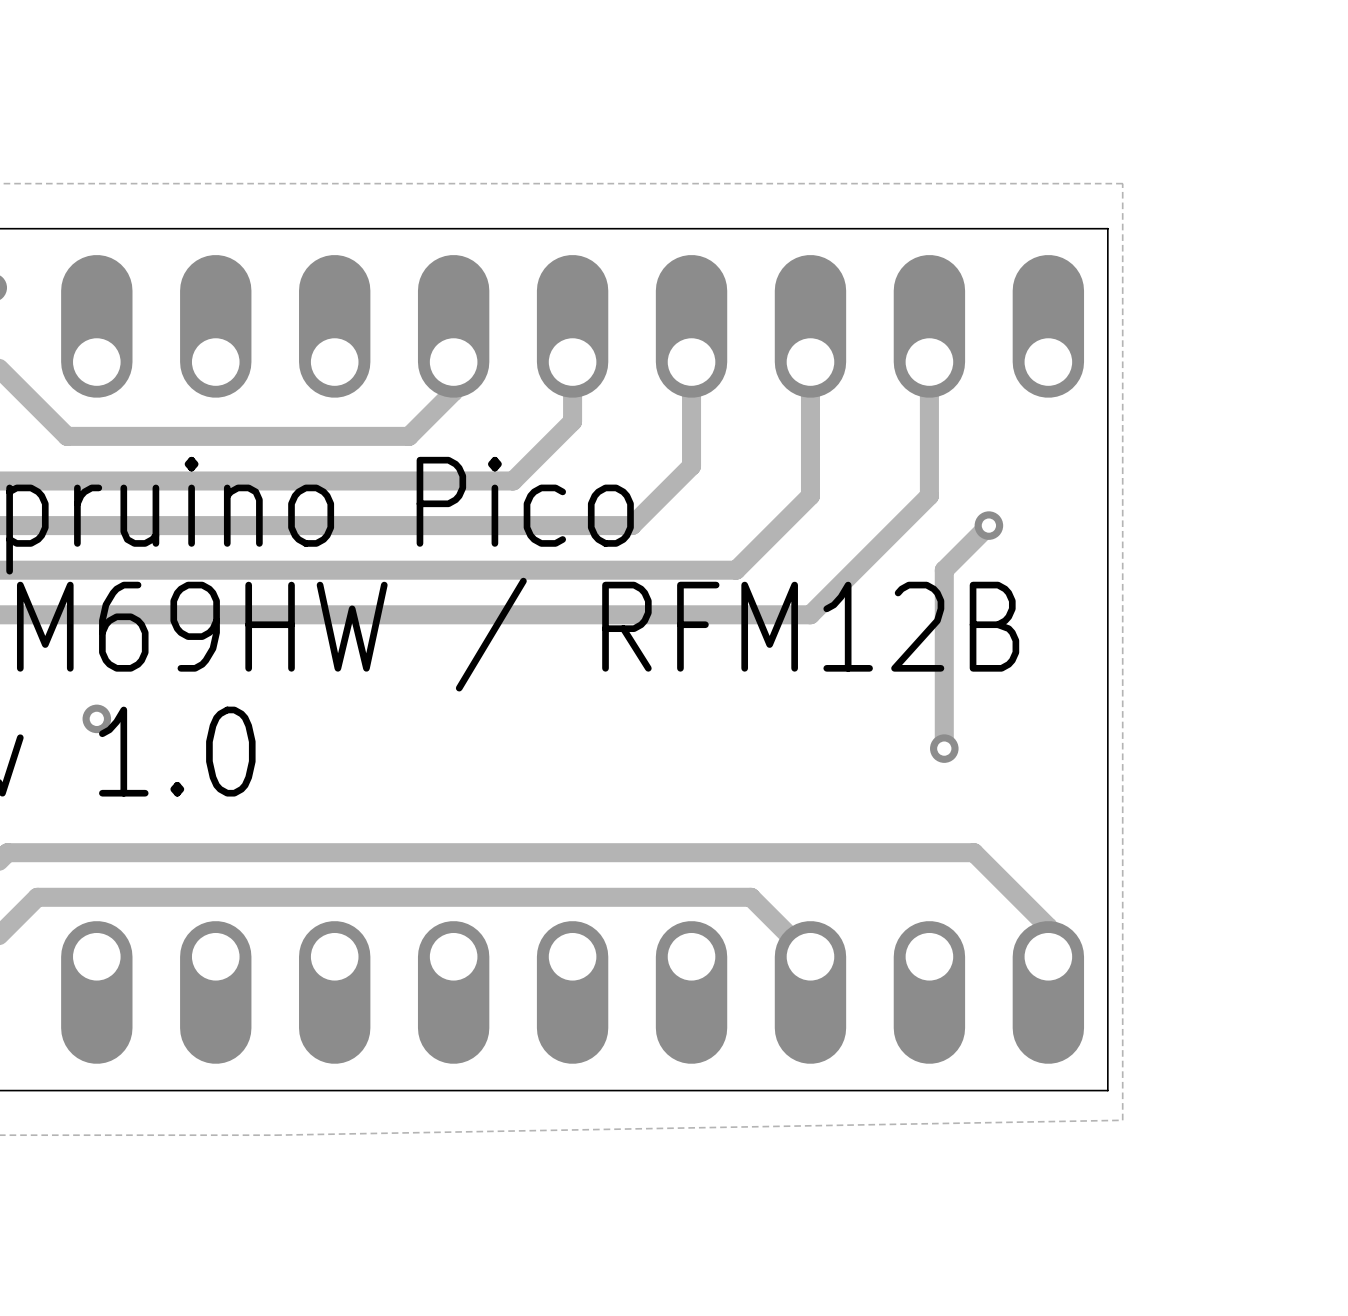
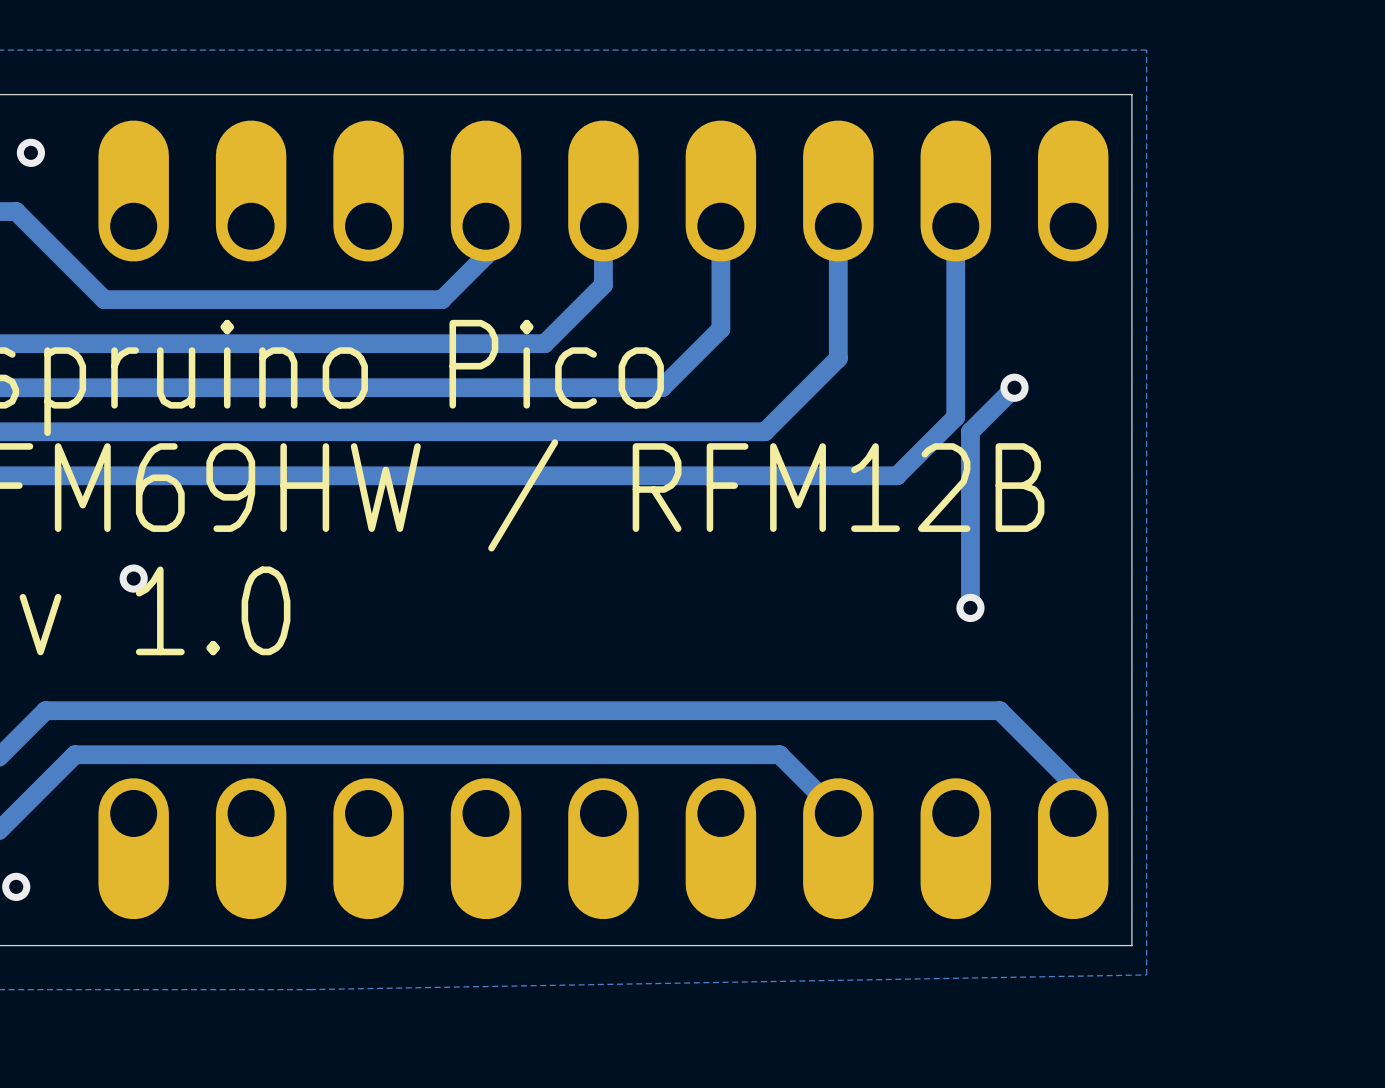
track: (929, 495) (810, 614) -> (955, 358) (955, 417) (897, 475) (838, 475)

